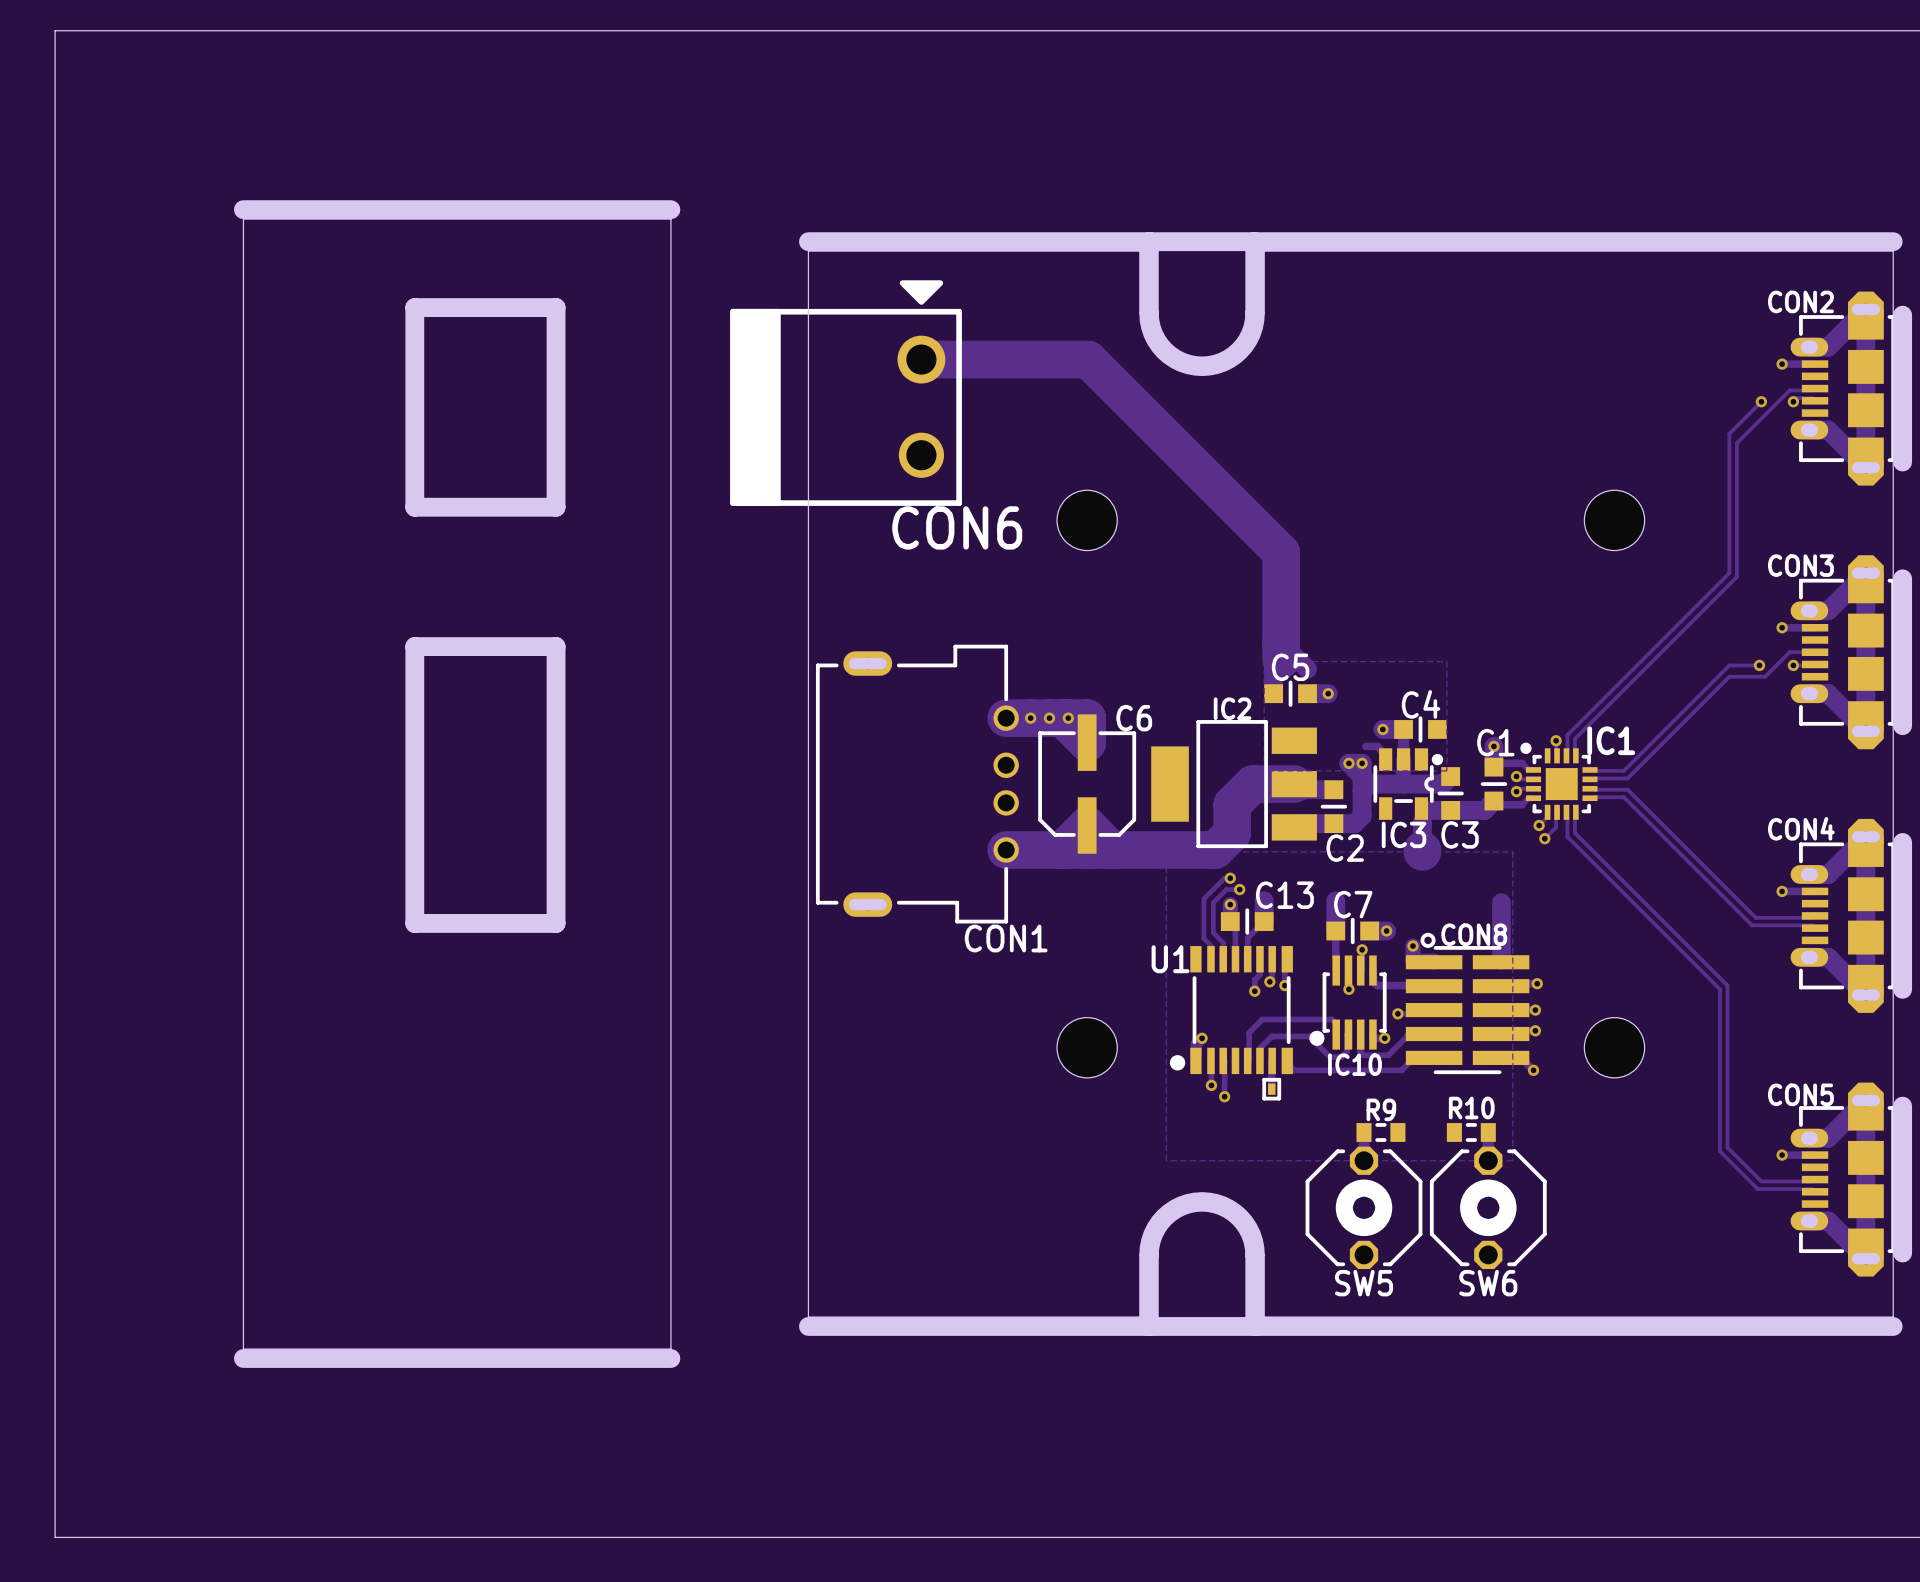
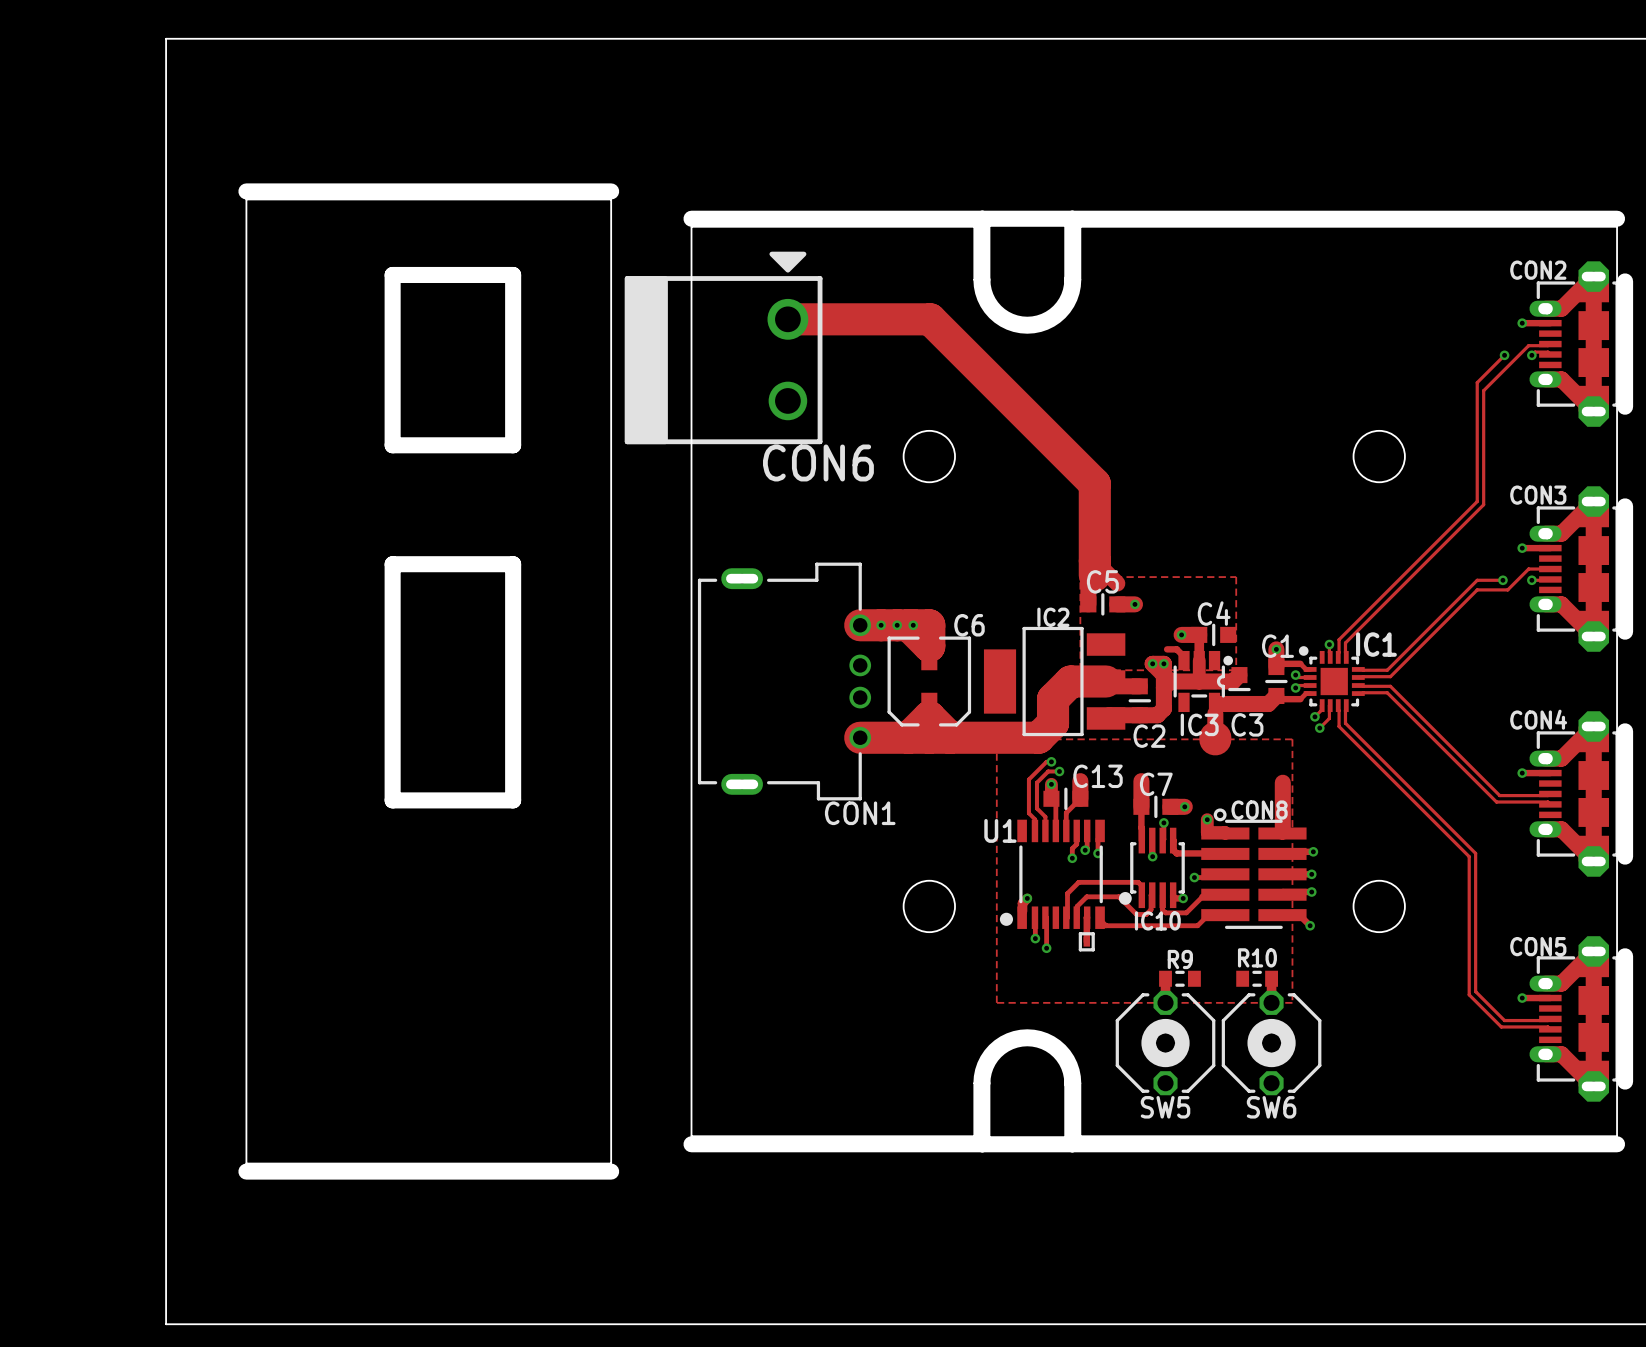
board edge: (192, 30) (55, 30) (55, 1537) (192, 1537) -> (166, 38) (166, 1324)
board edge: (243, 209) (286, 209) -> (574, 191) (611, 191)
board edge: (458, 307) (414, 307) (414, 507) (458, 507) -> (392, 274) (392, 445)
board edge: (556, 307) (556, 507) -> (476, 274) (513, 274) (513, 445) (476, 445)
board edge: (458, 646) (414, 646) (414, 923) (458, 923) -> (392, 564) (392, 800)
board edge: (556, 646) (556, 923) -> (476, 564) (513, 564) (513, 800) (476, 800)
drawing position: (457, 784) -> (428, 681)
board edge: (243, 1358) (286, 1358) -> (574, 1171) (611, 1171)

